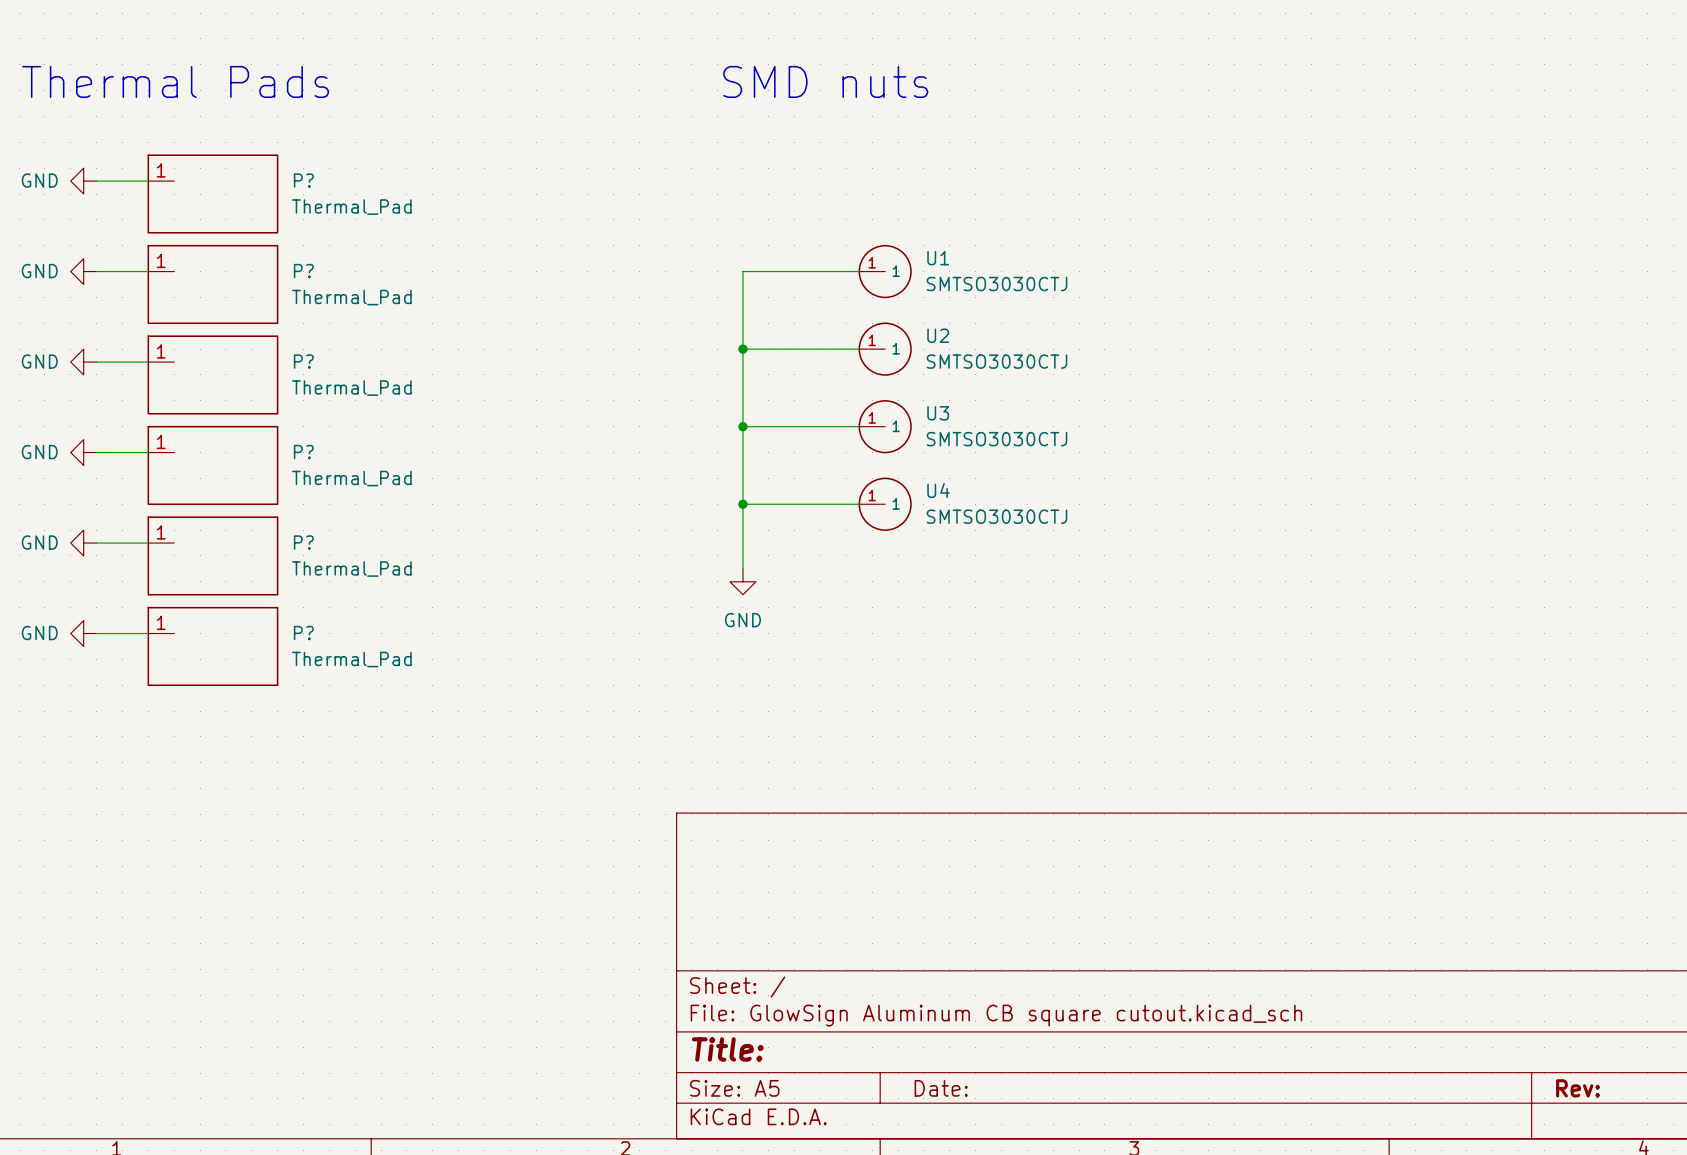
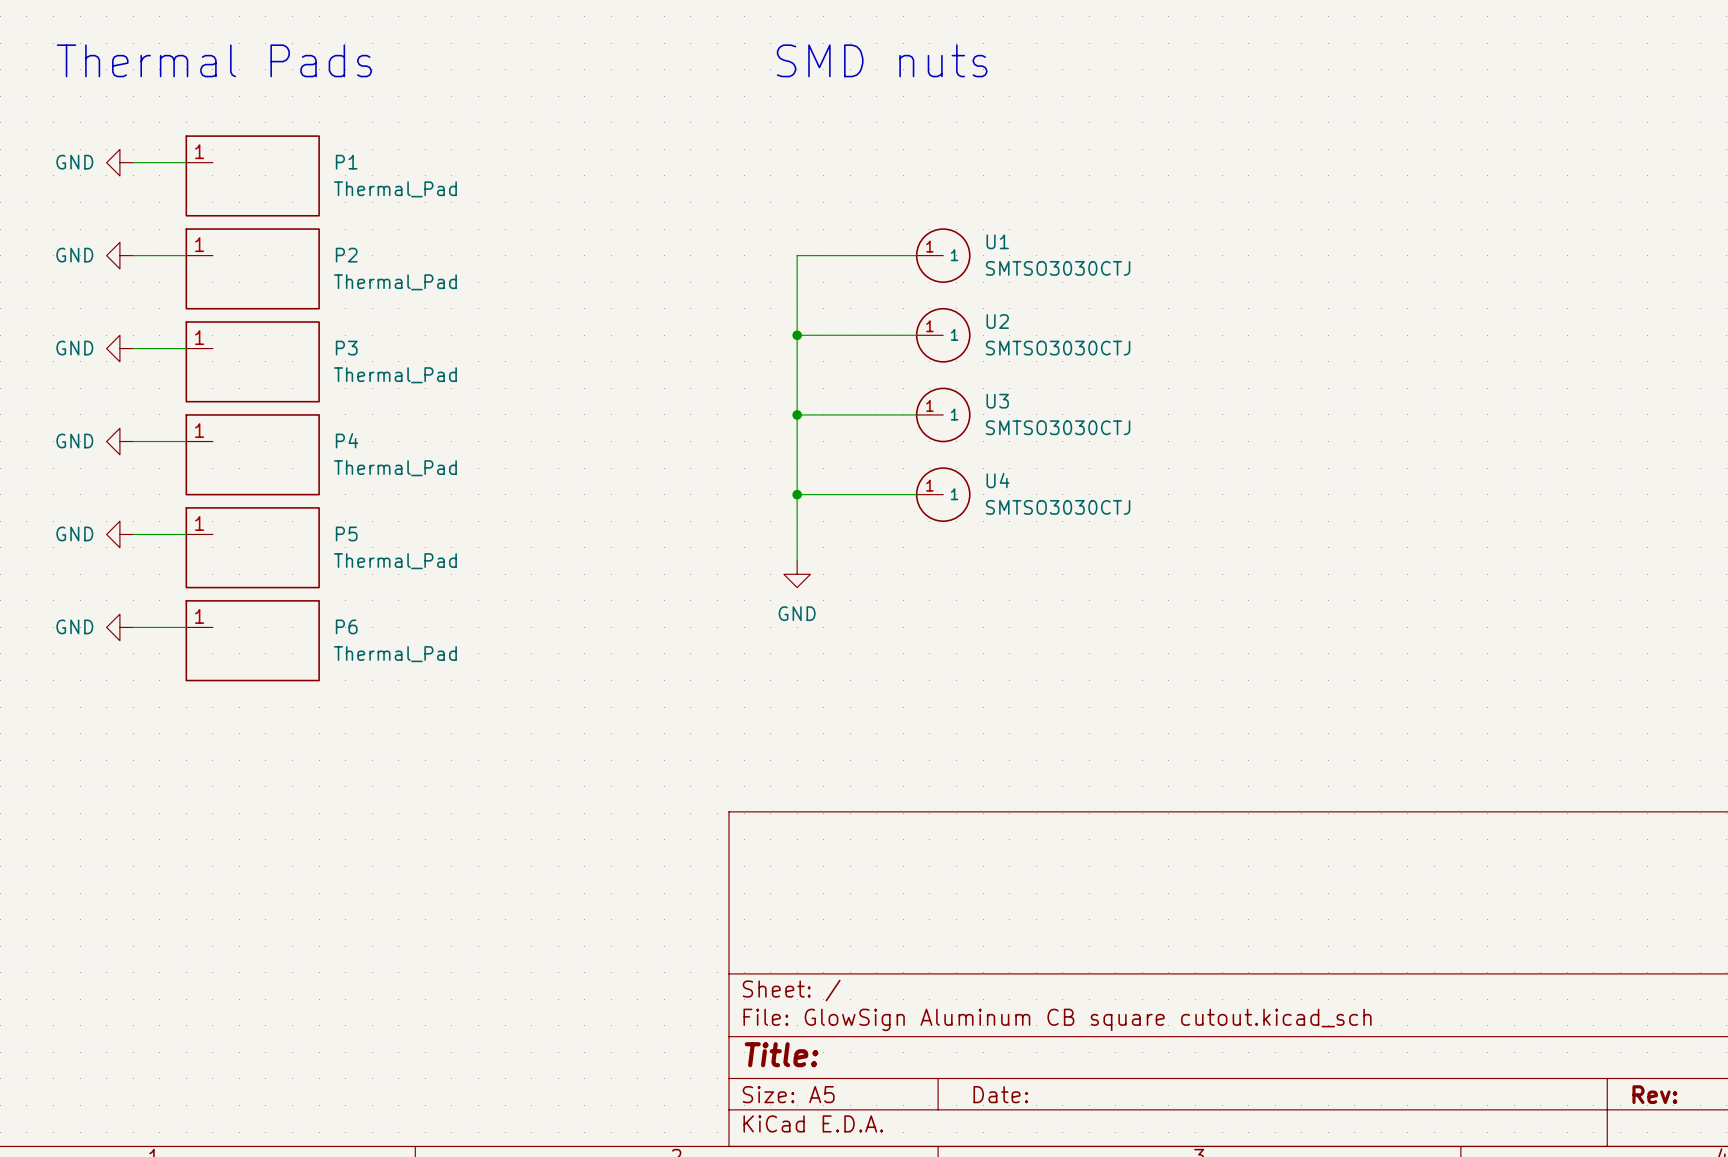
P? name: P? (303, 180) -> P1 (346, 162)
P? name: P? (303, 271) -> P2 (346, 255)
P? name: P? (303, 361) -> P3 (346, 348)
P? name: P? (303, 452) -> P4 (347, 440)
P? name: P? (303, 542) -> P5 (346, 533)
P? name: P? (303, 633) -> P6 (346, 626)

